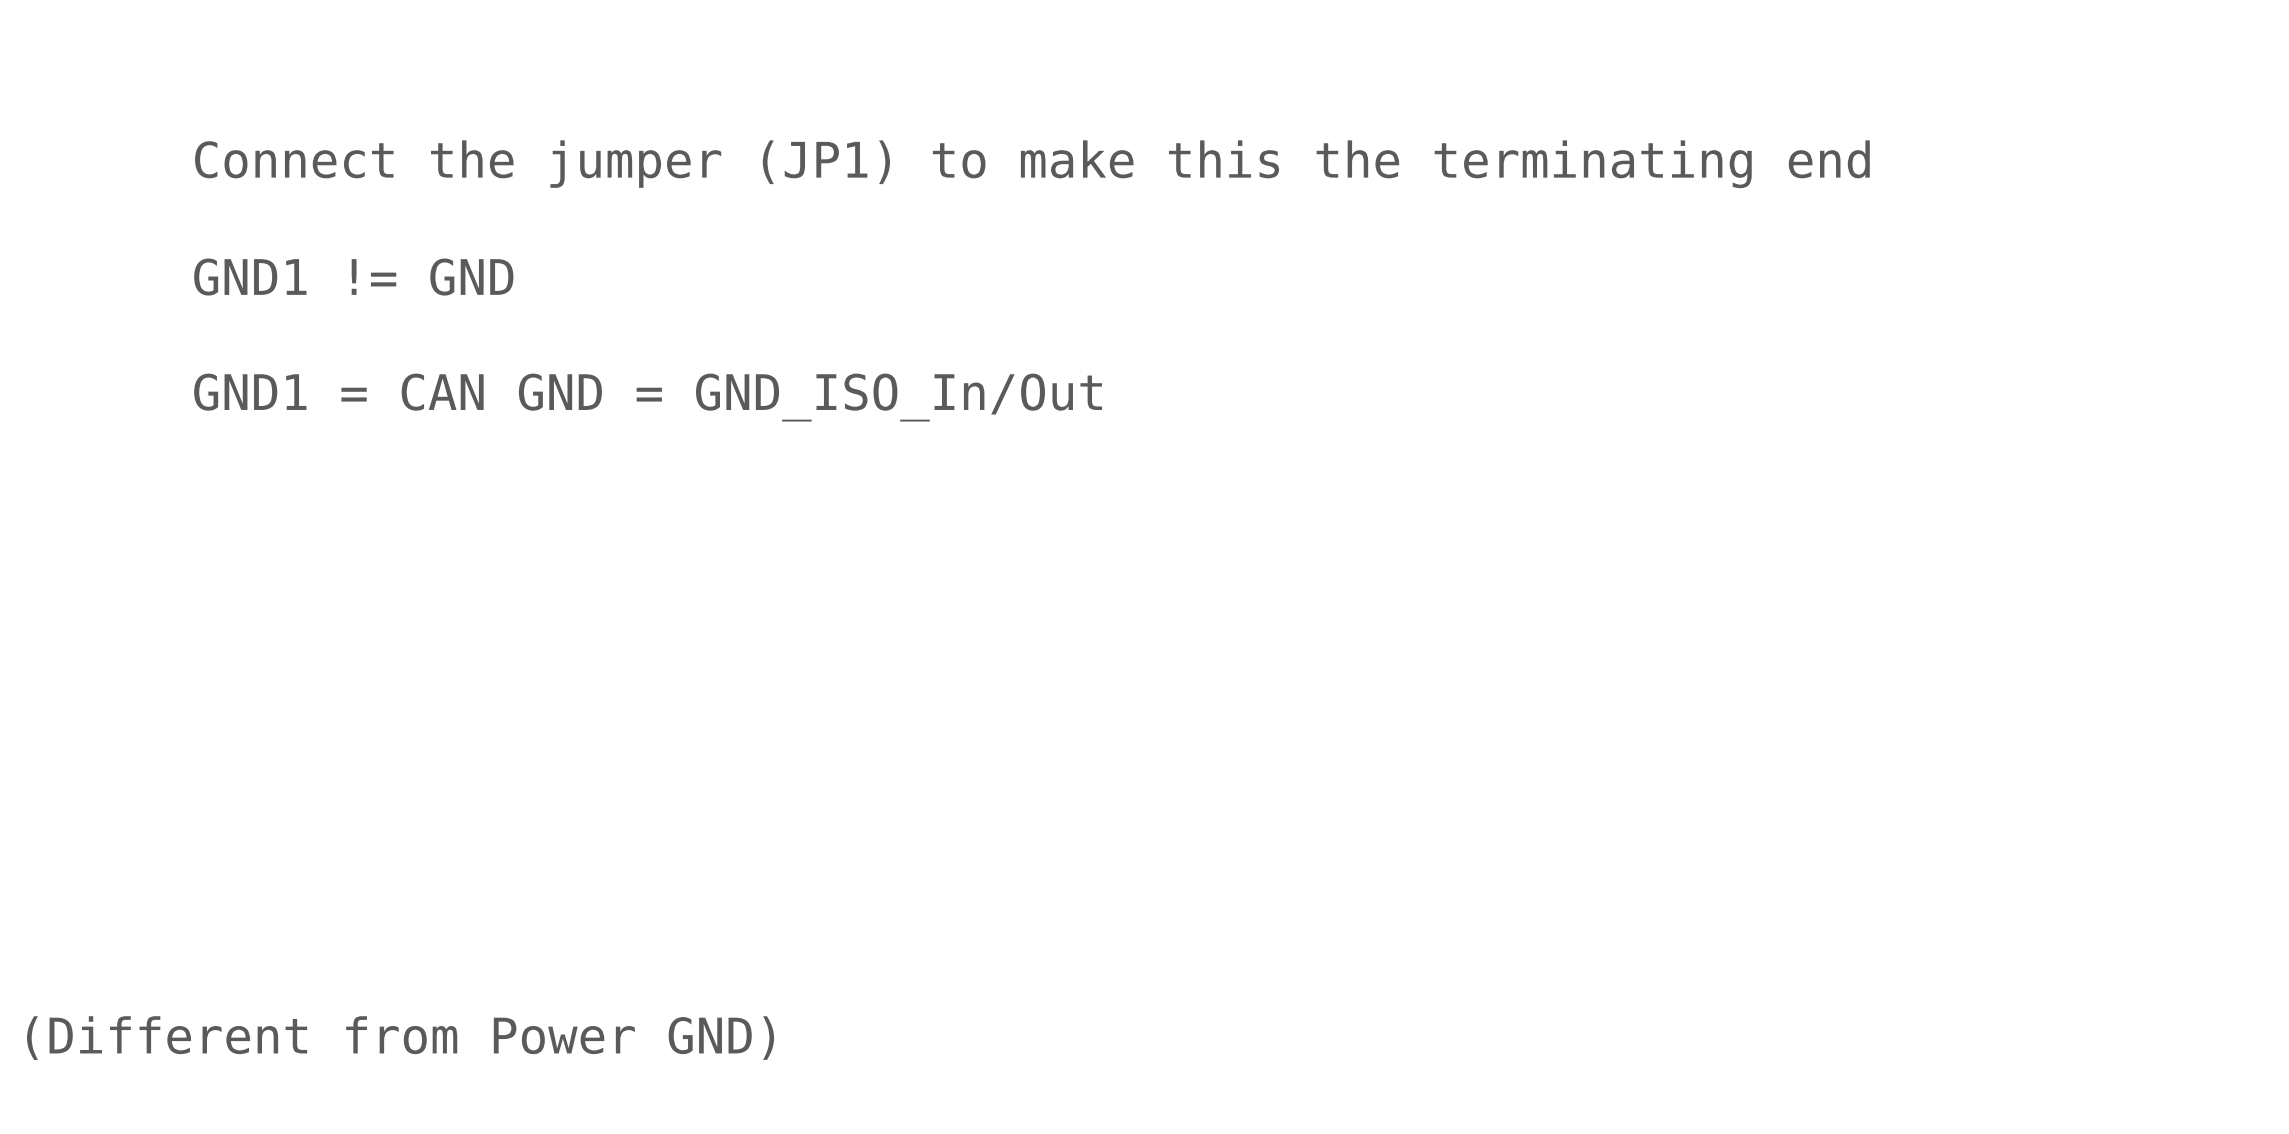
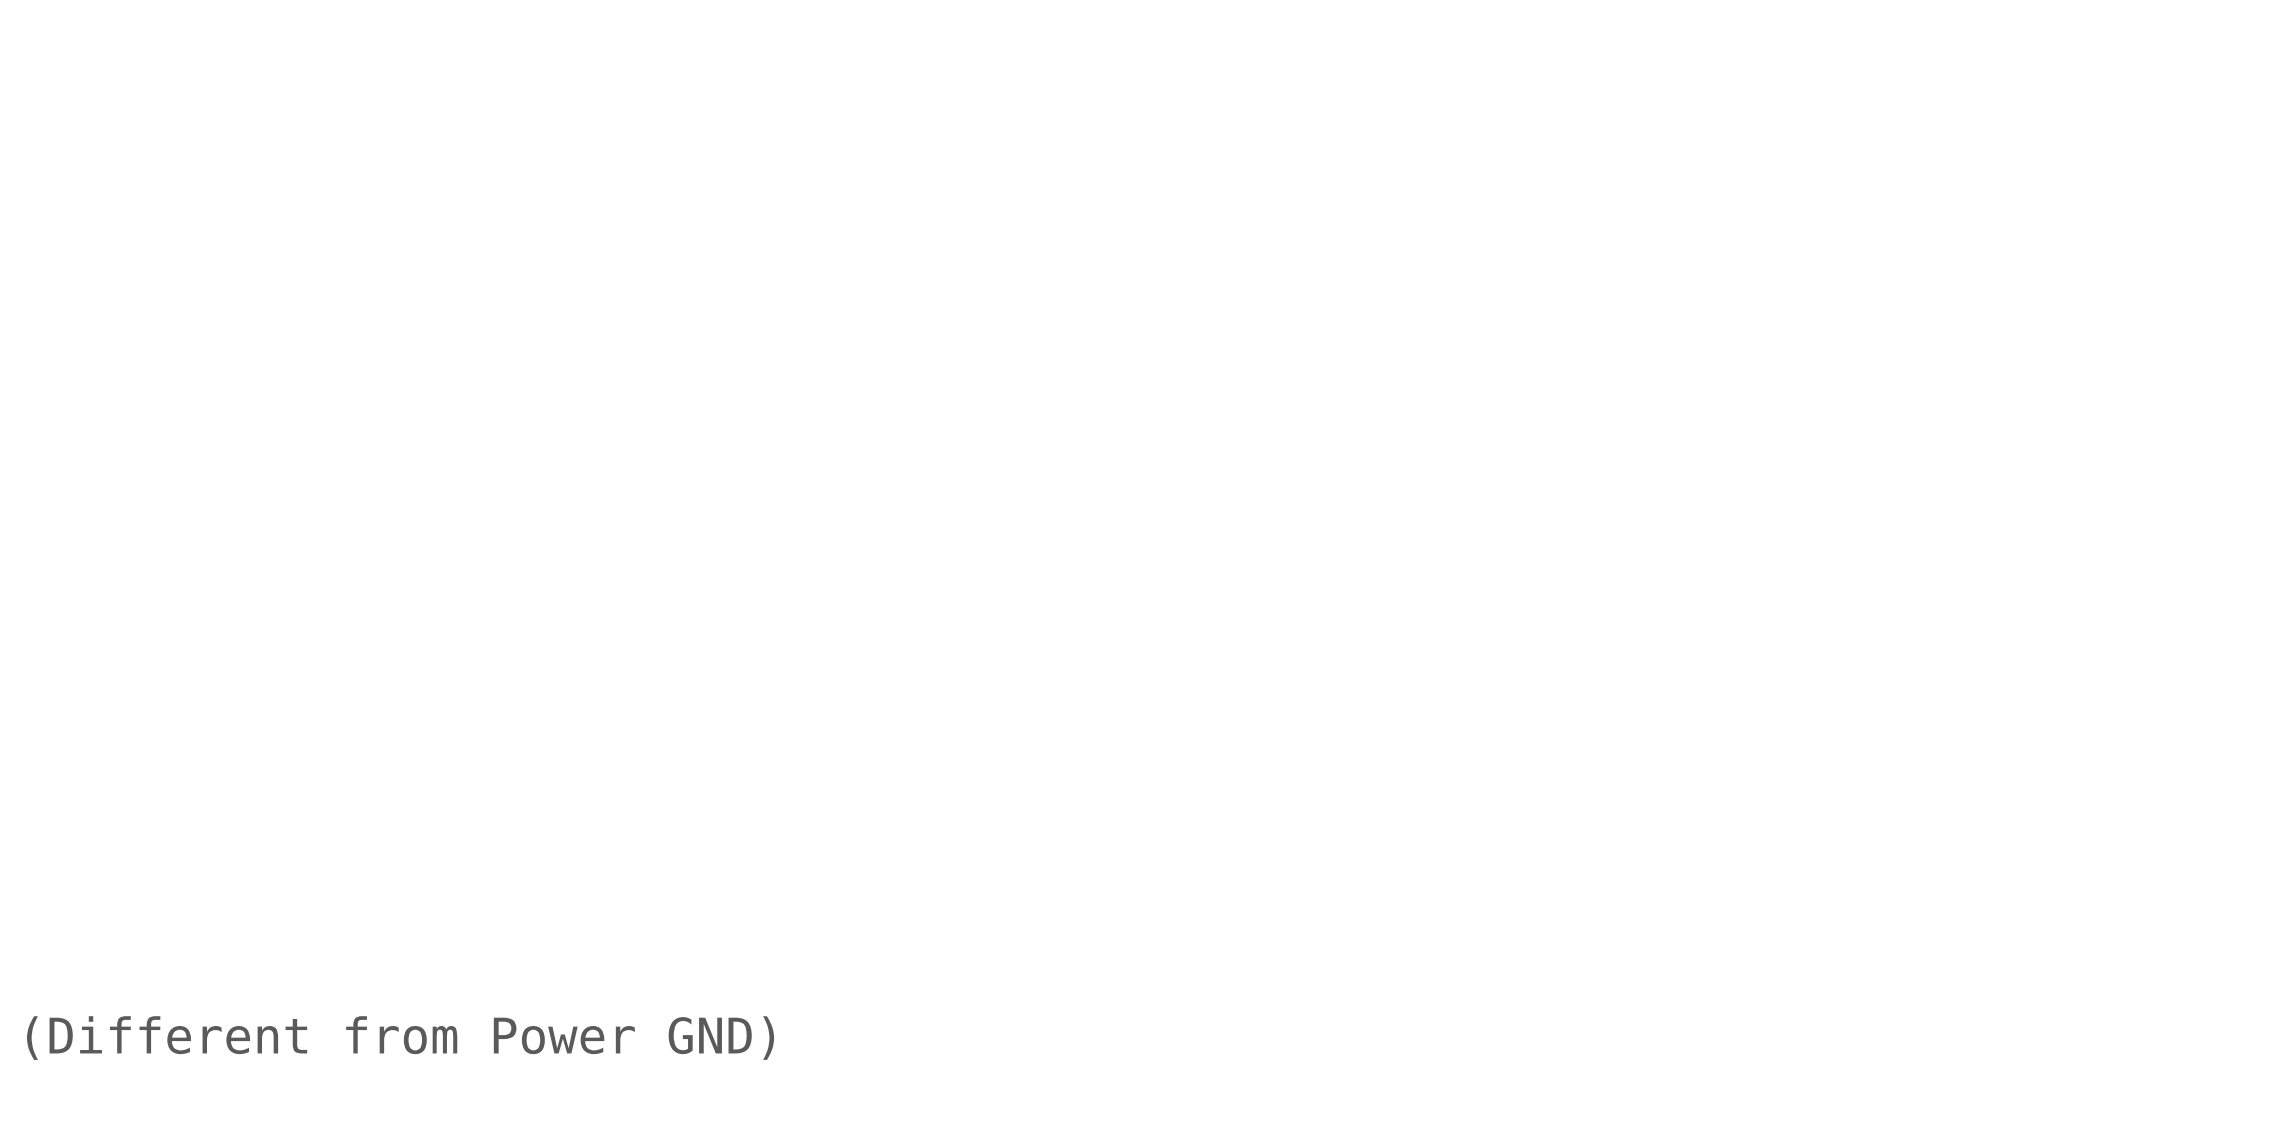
text: Connect the jumper (JP1) to make this the terminating end (1032, 164) -> none
text: GND1 != GND (353, 277) -> none
text: GND1 = CAN GND = GND_ISO_In/Out (648, 397) -> none

